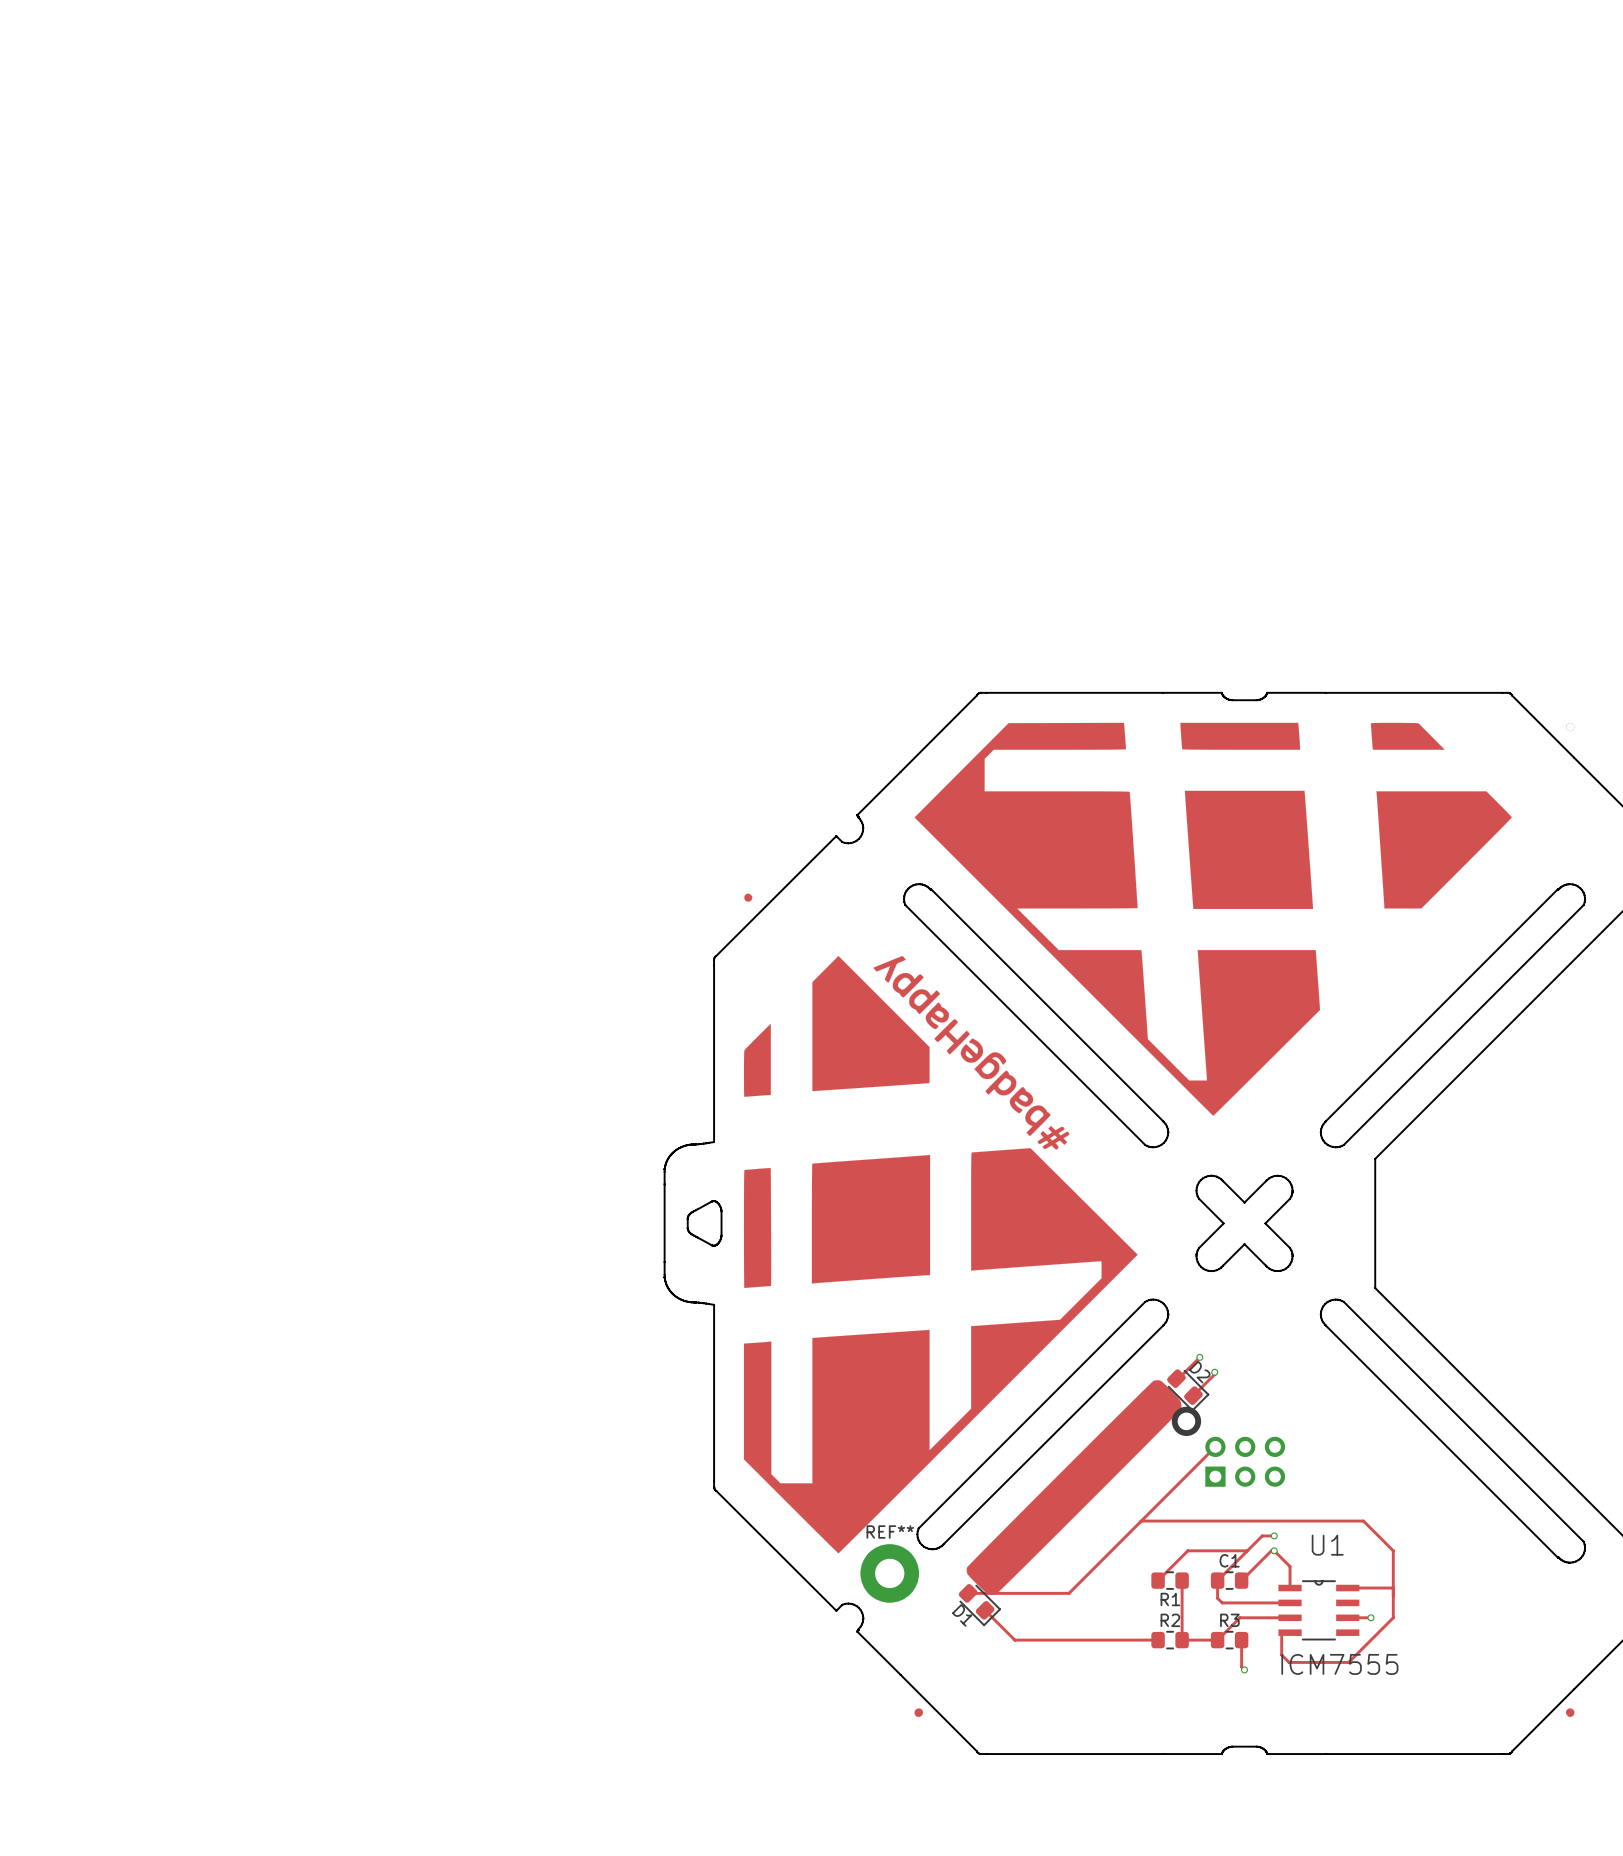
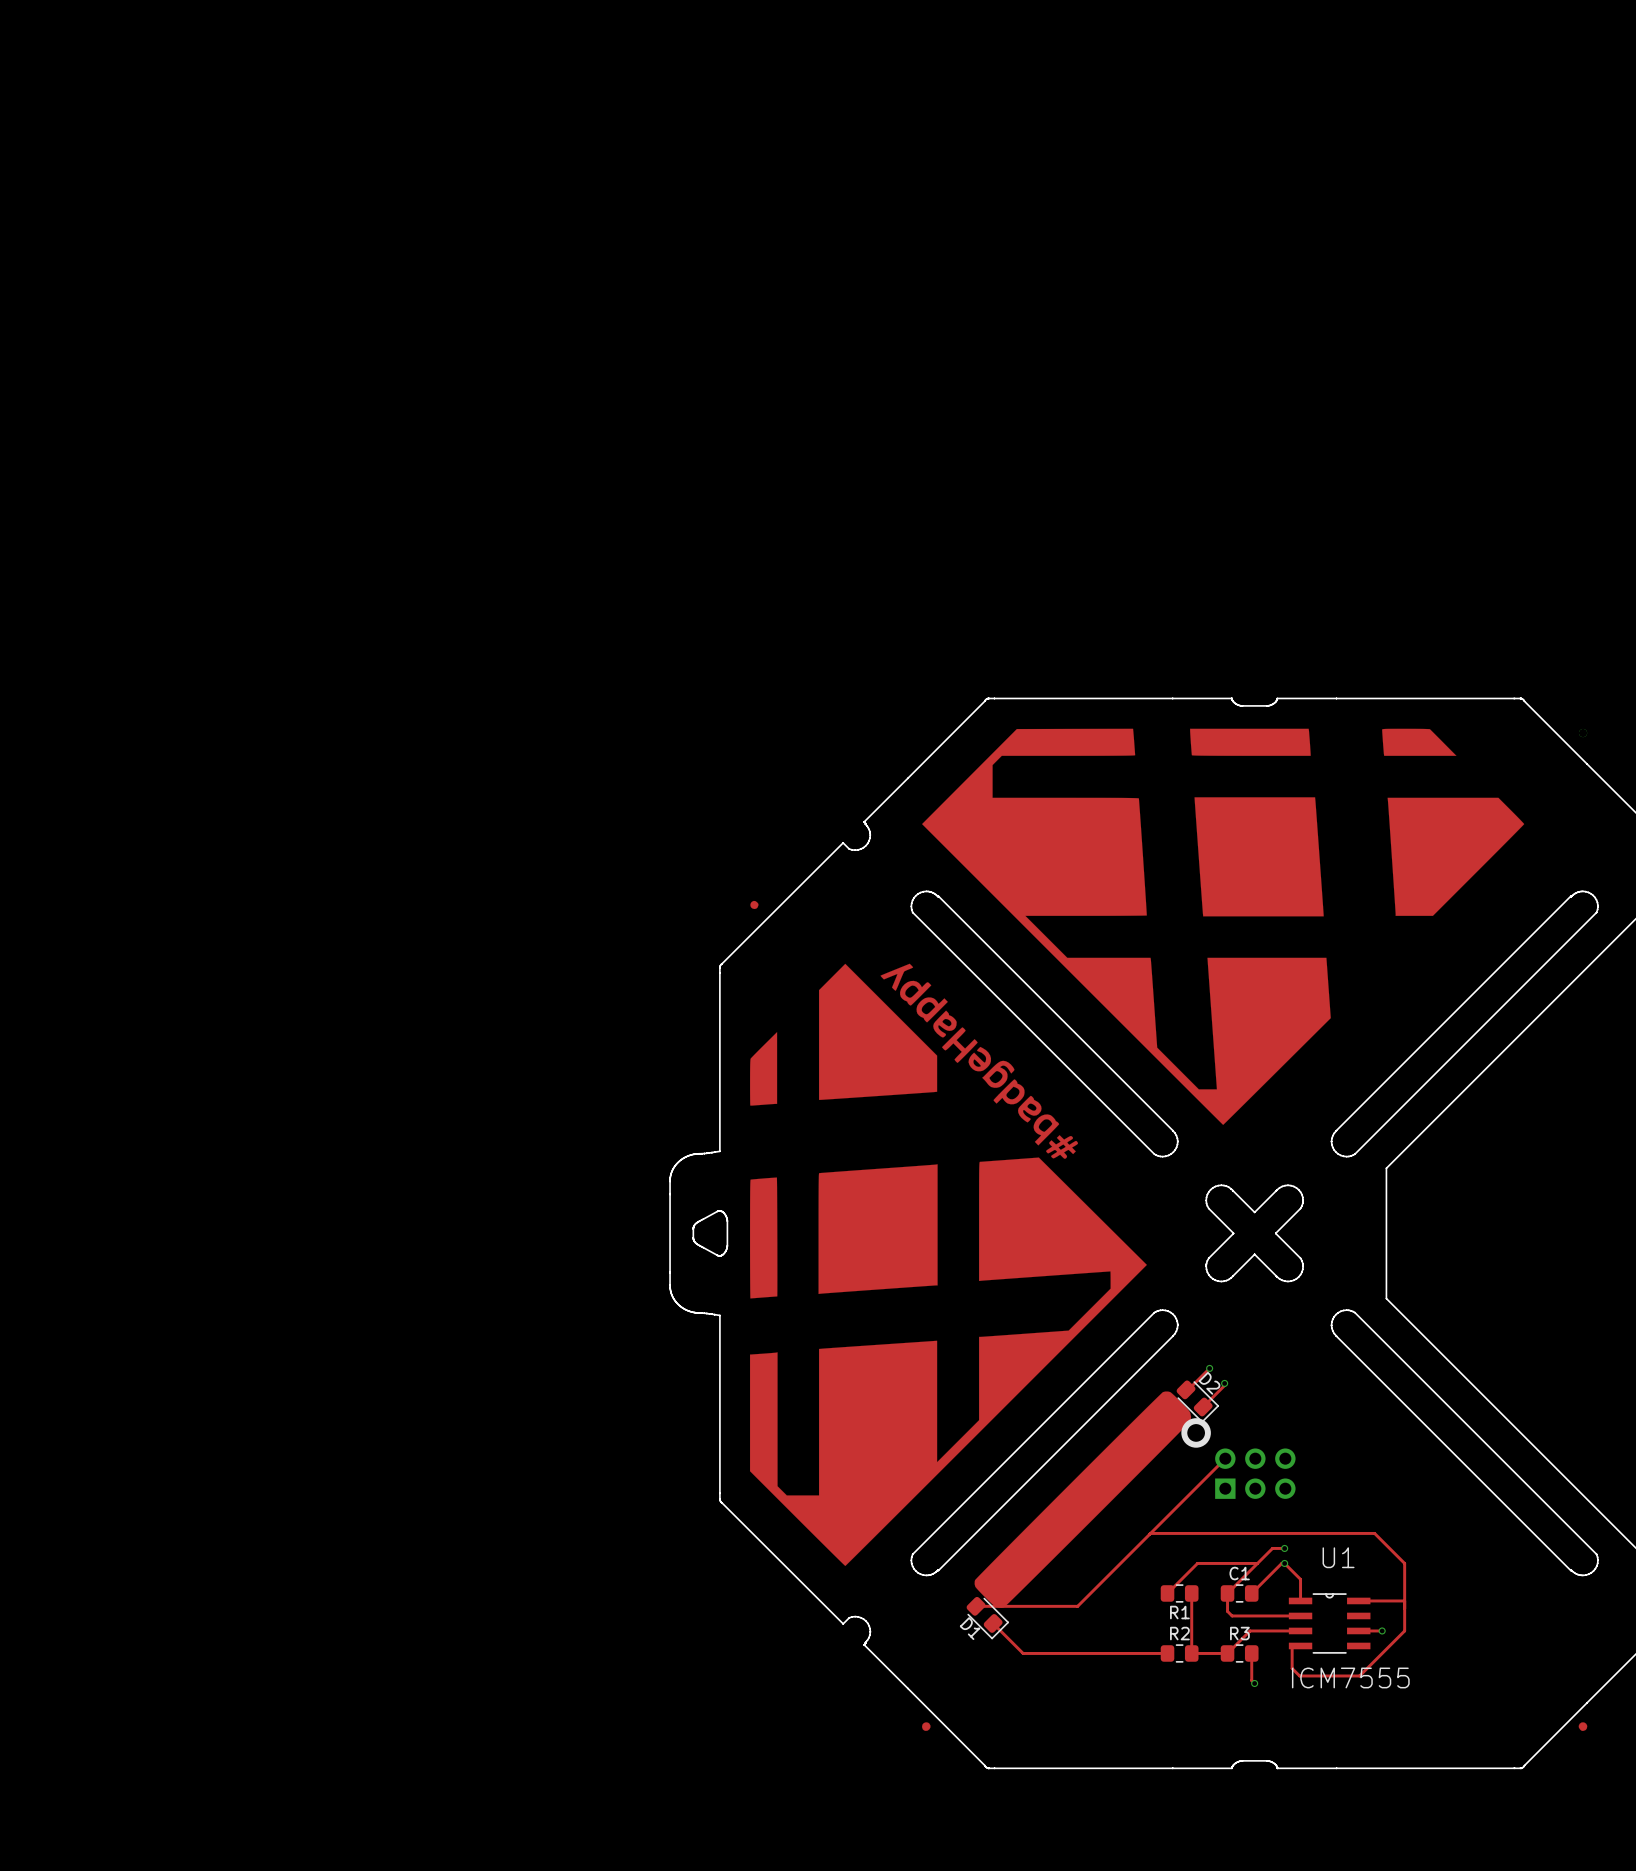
board edge: (1163, 1325) (944, 1543) -> (1172, 1336) (938, 1570) (926, 1575) (915, 1571) (911, 1560) (912, 1554) (926, 1540)
board edge: (918, 1528) (917, 1537) (924, 1546) (934, 1549) (943, 1543) -> none
REF**: (889, 1573) -> none

